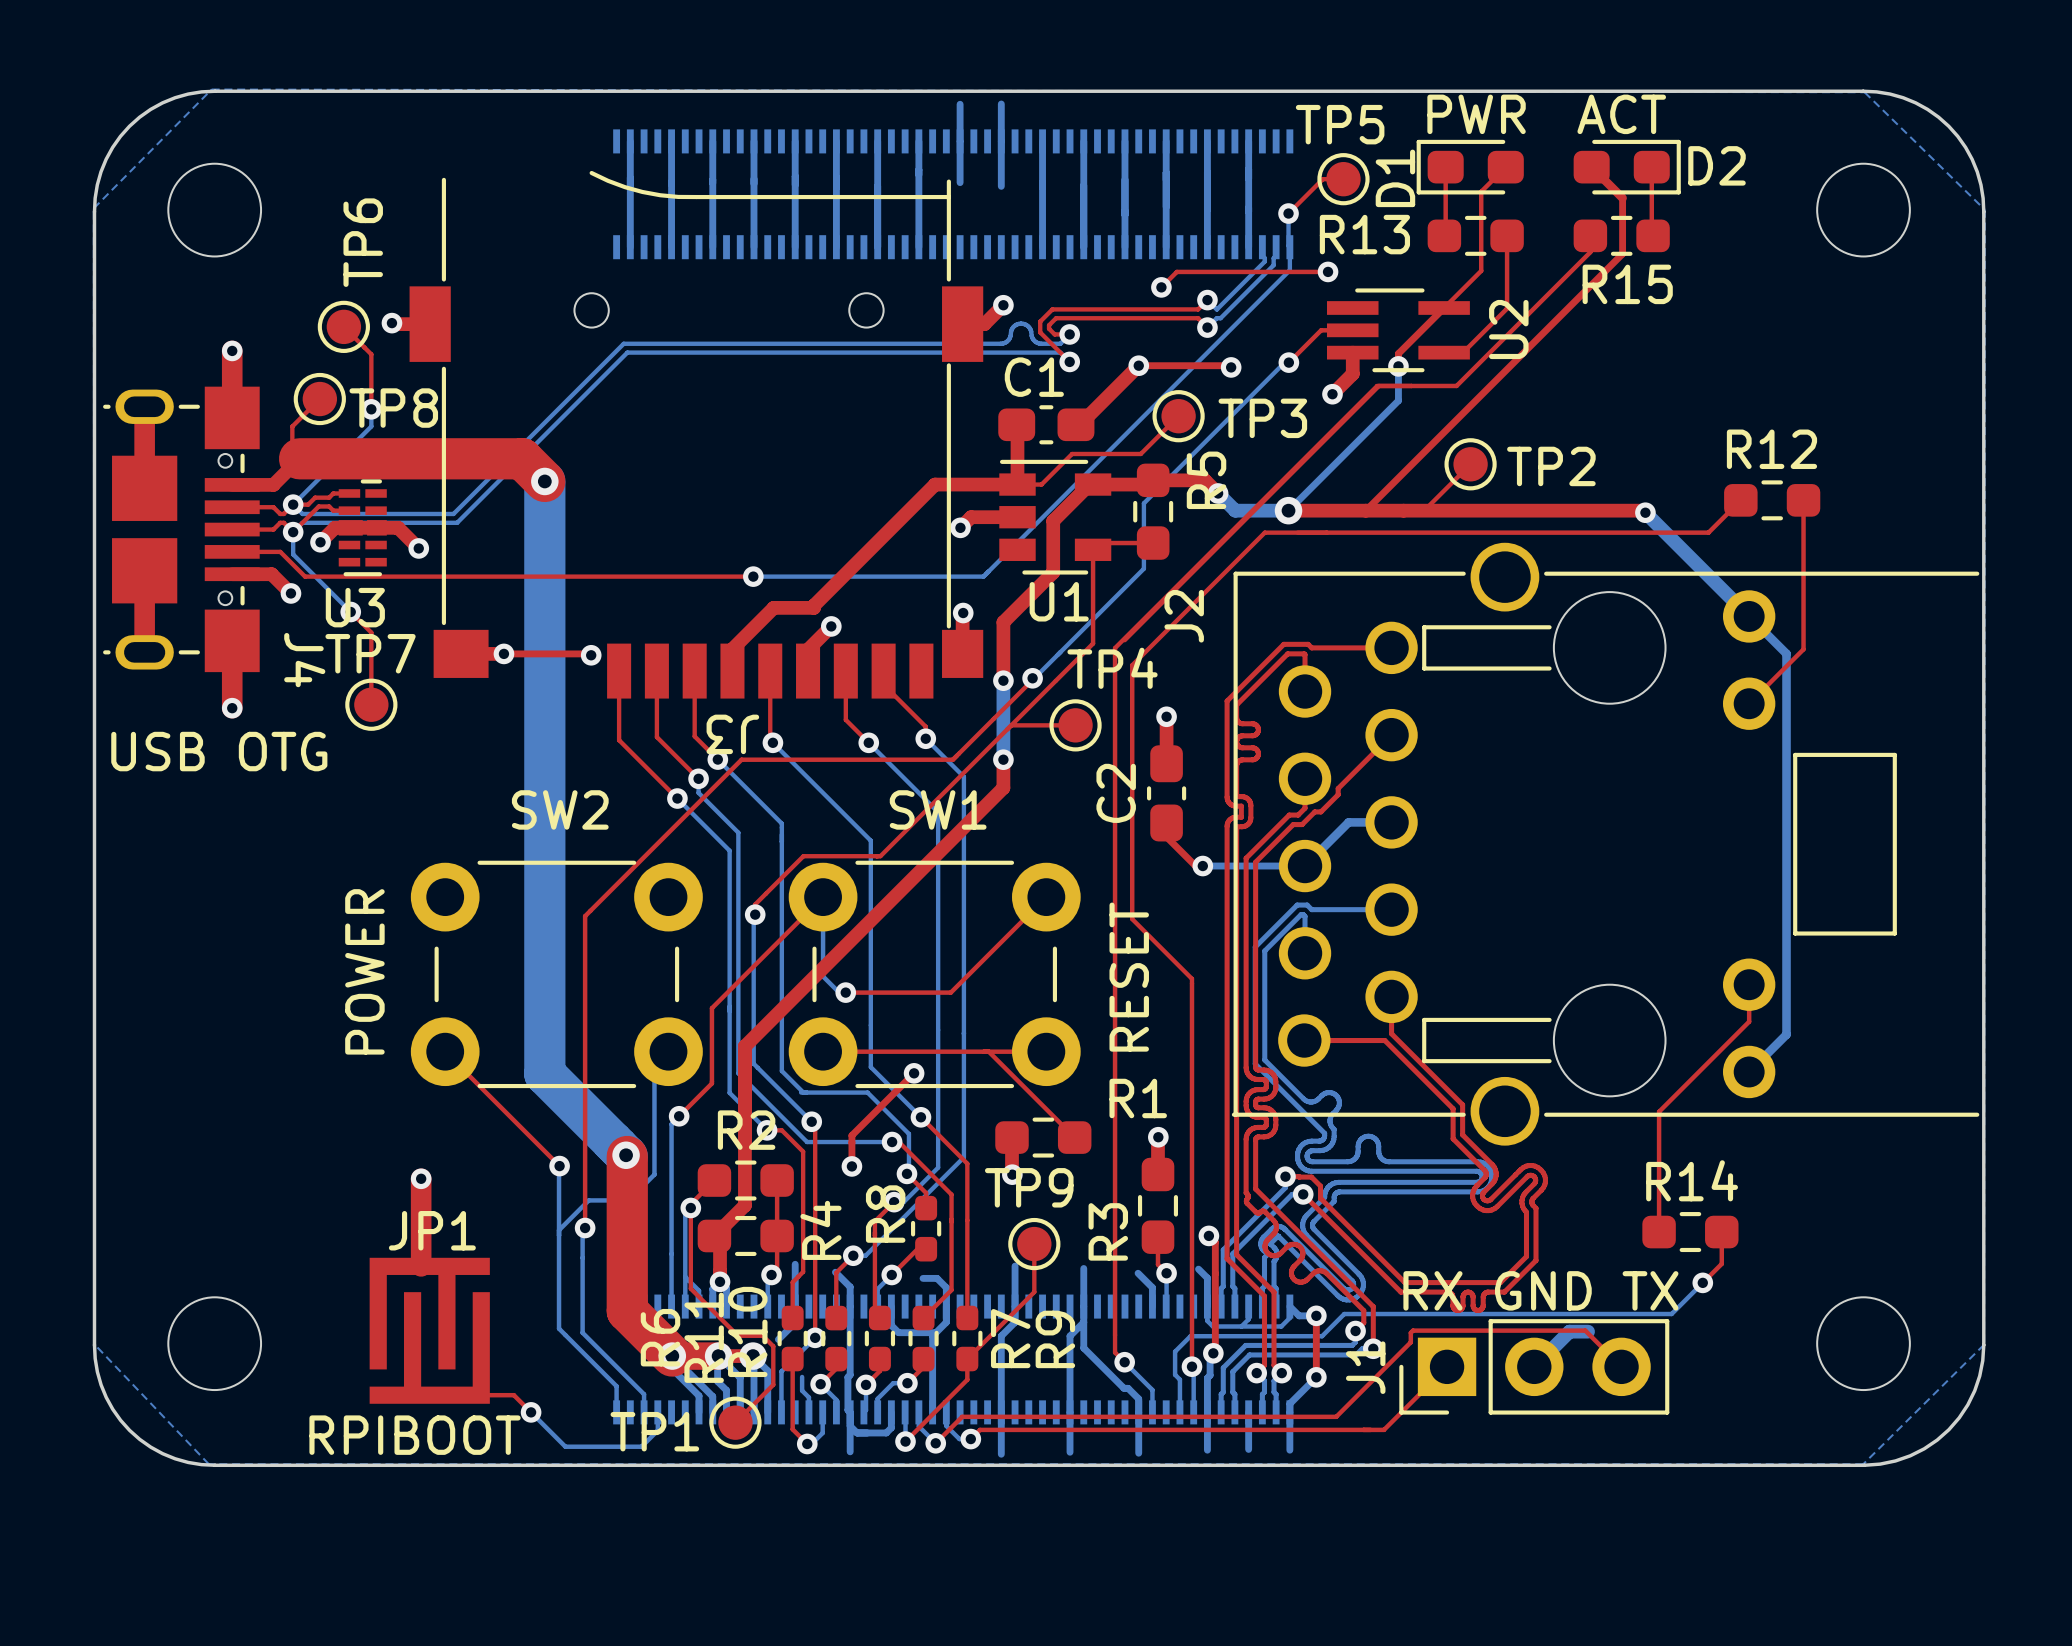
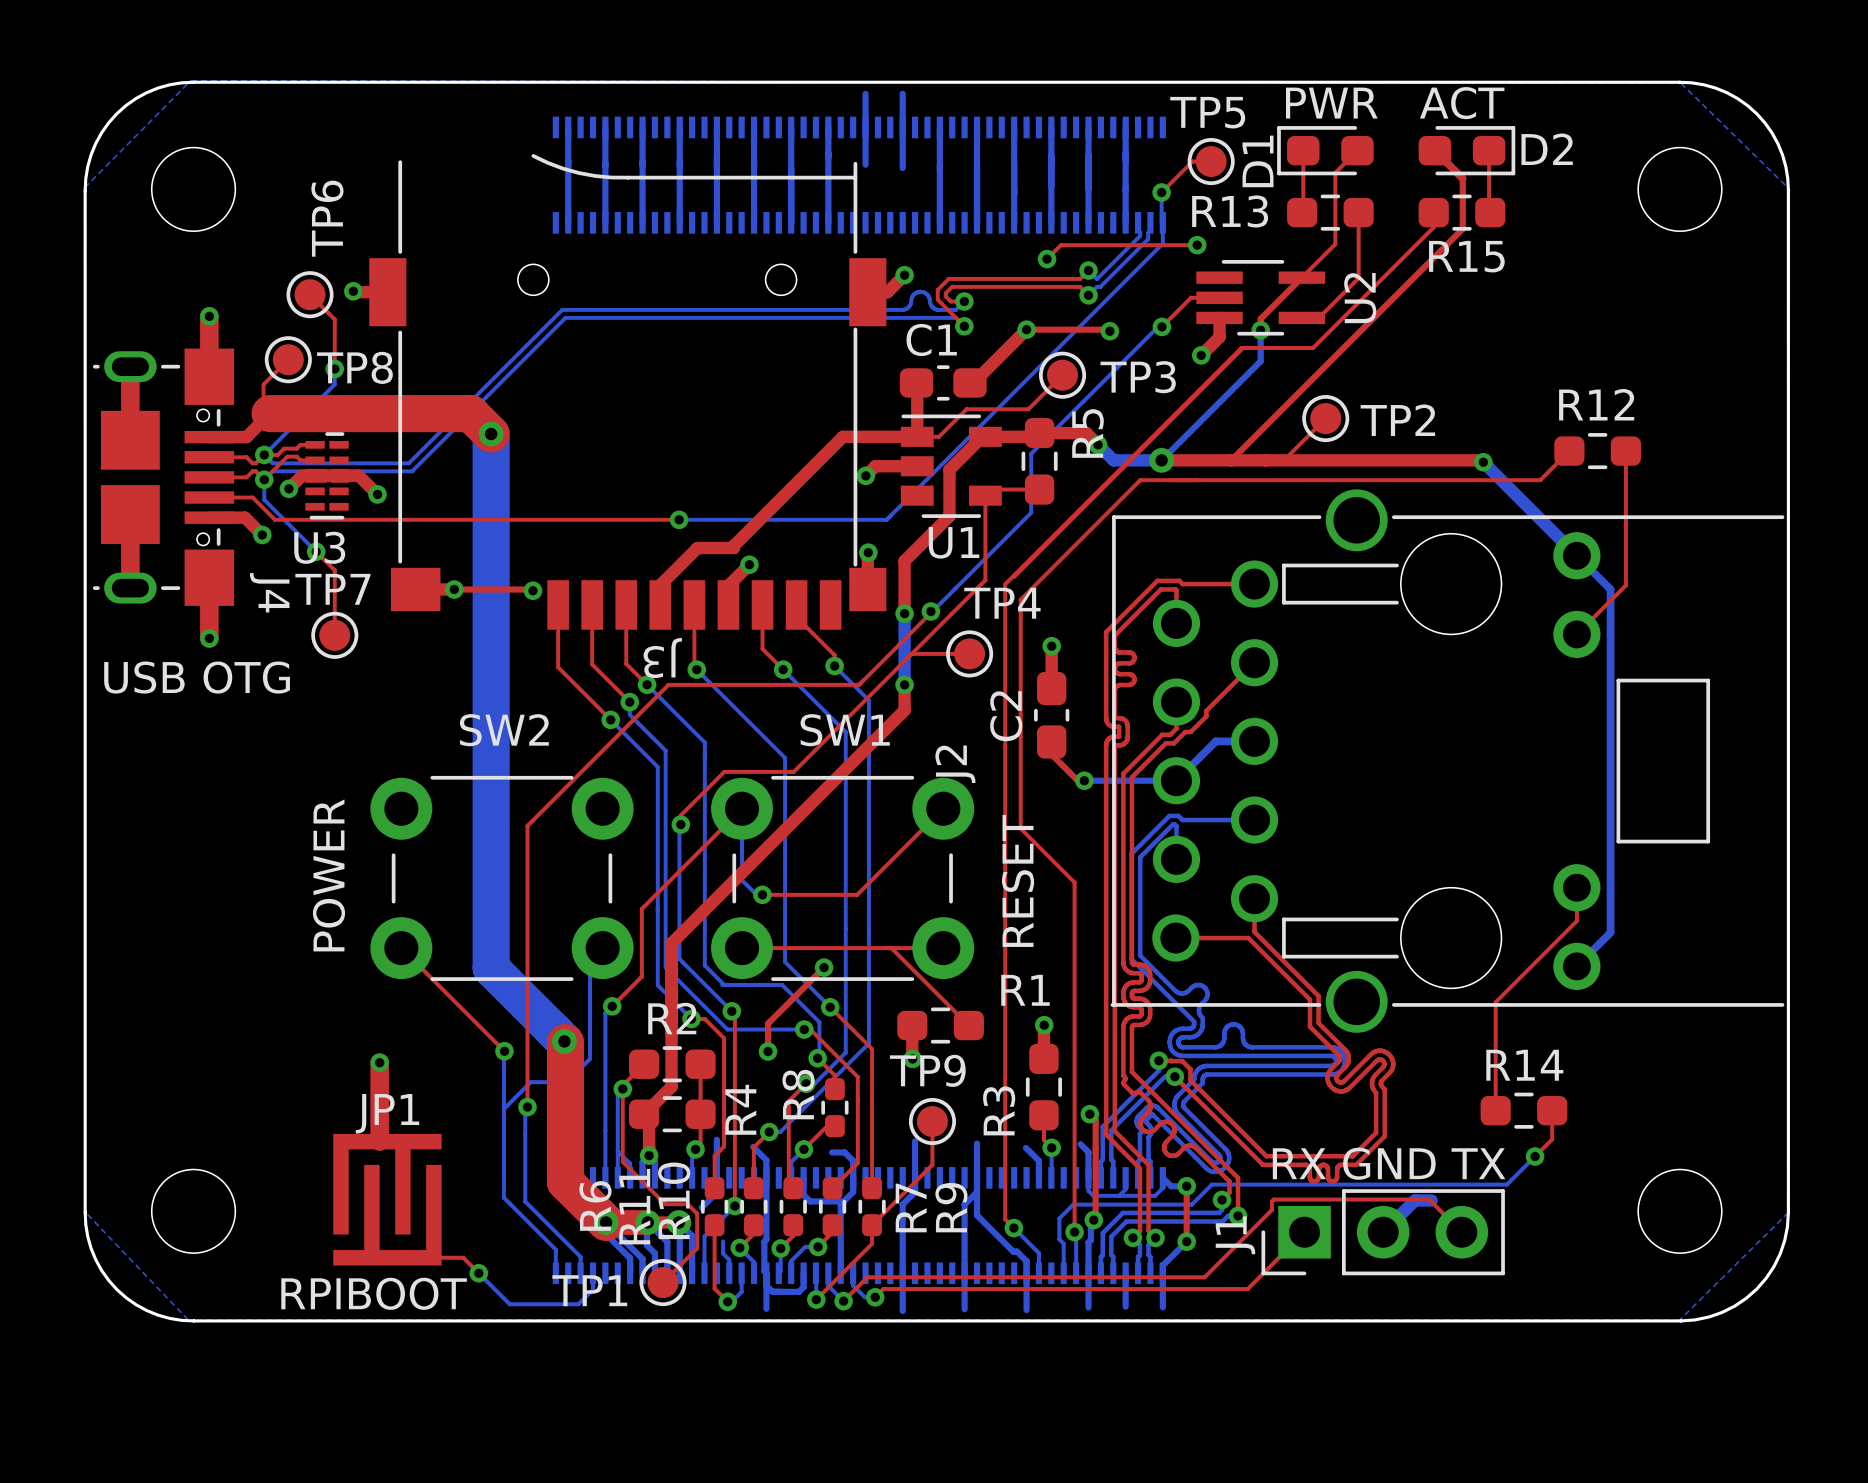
J2 name position: J2 (1184, 616) -> J2 (955, 764)

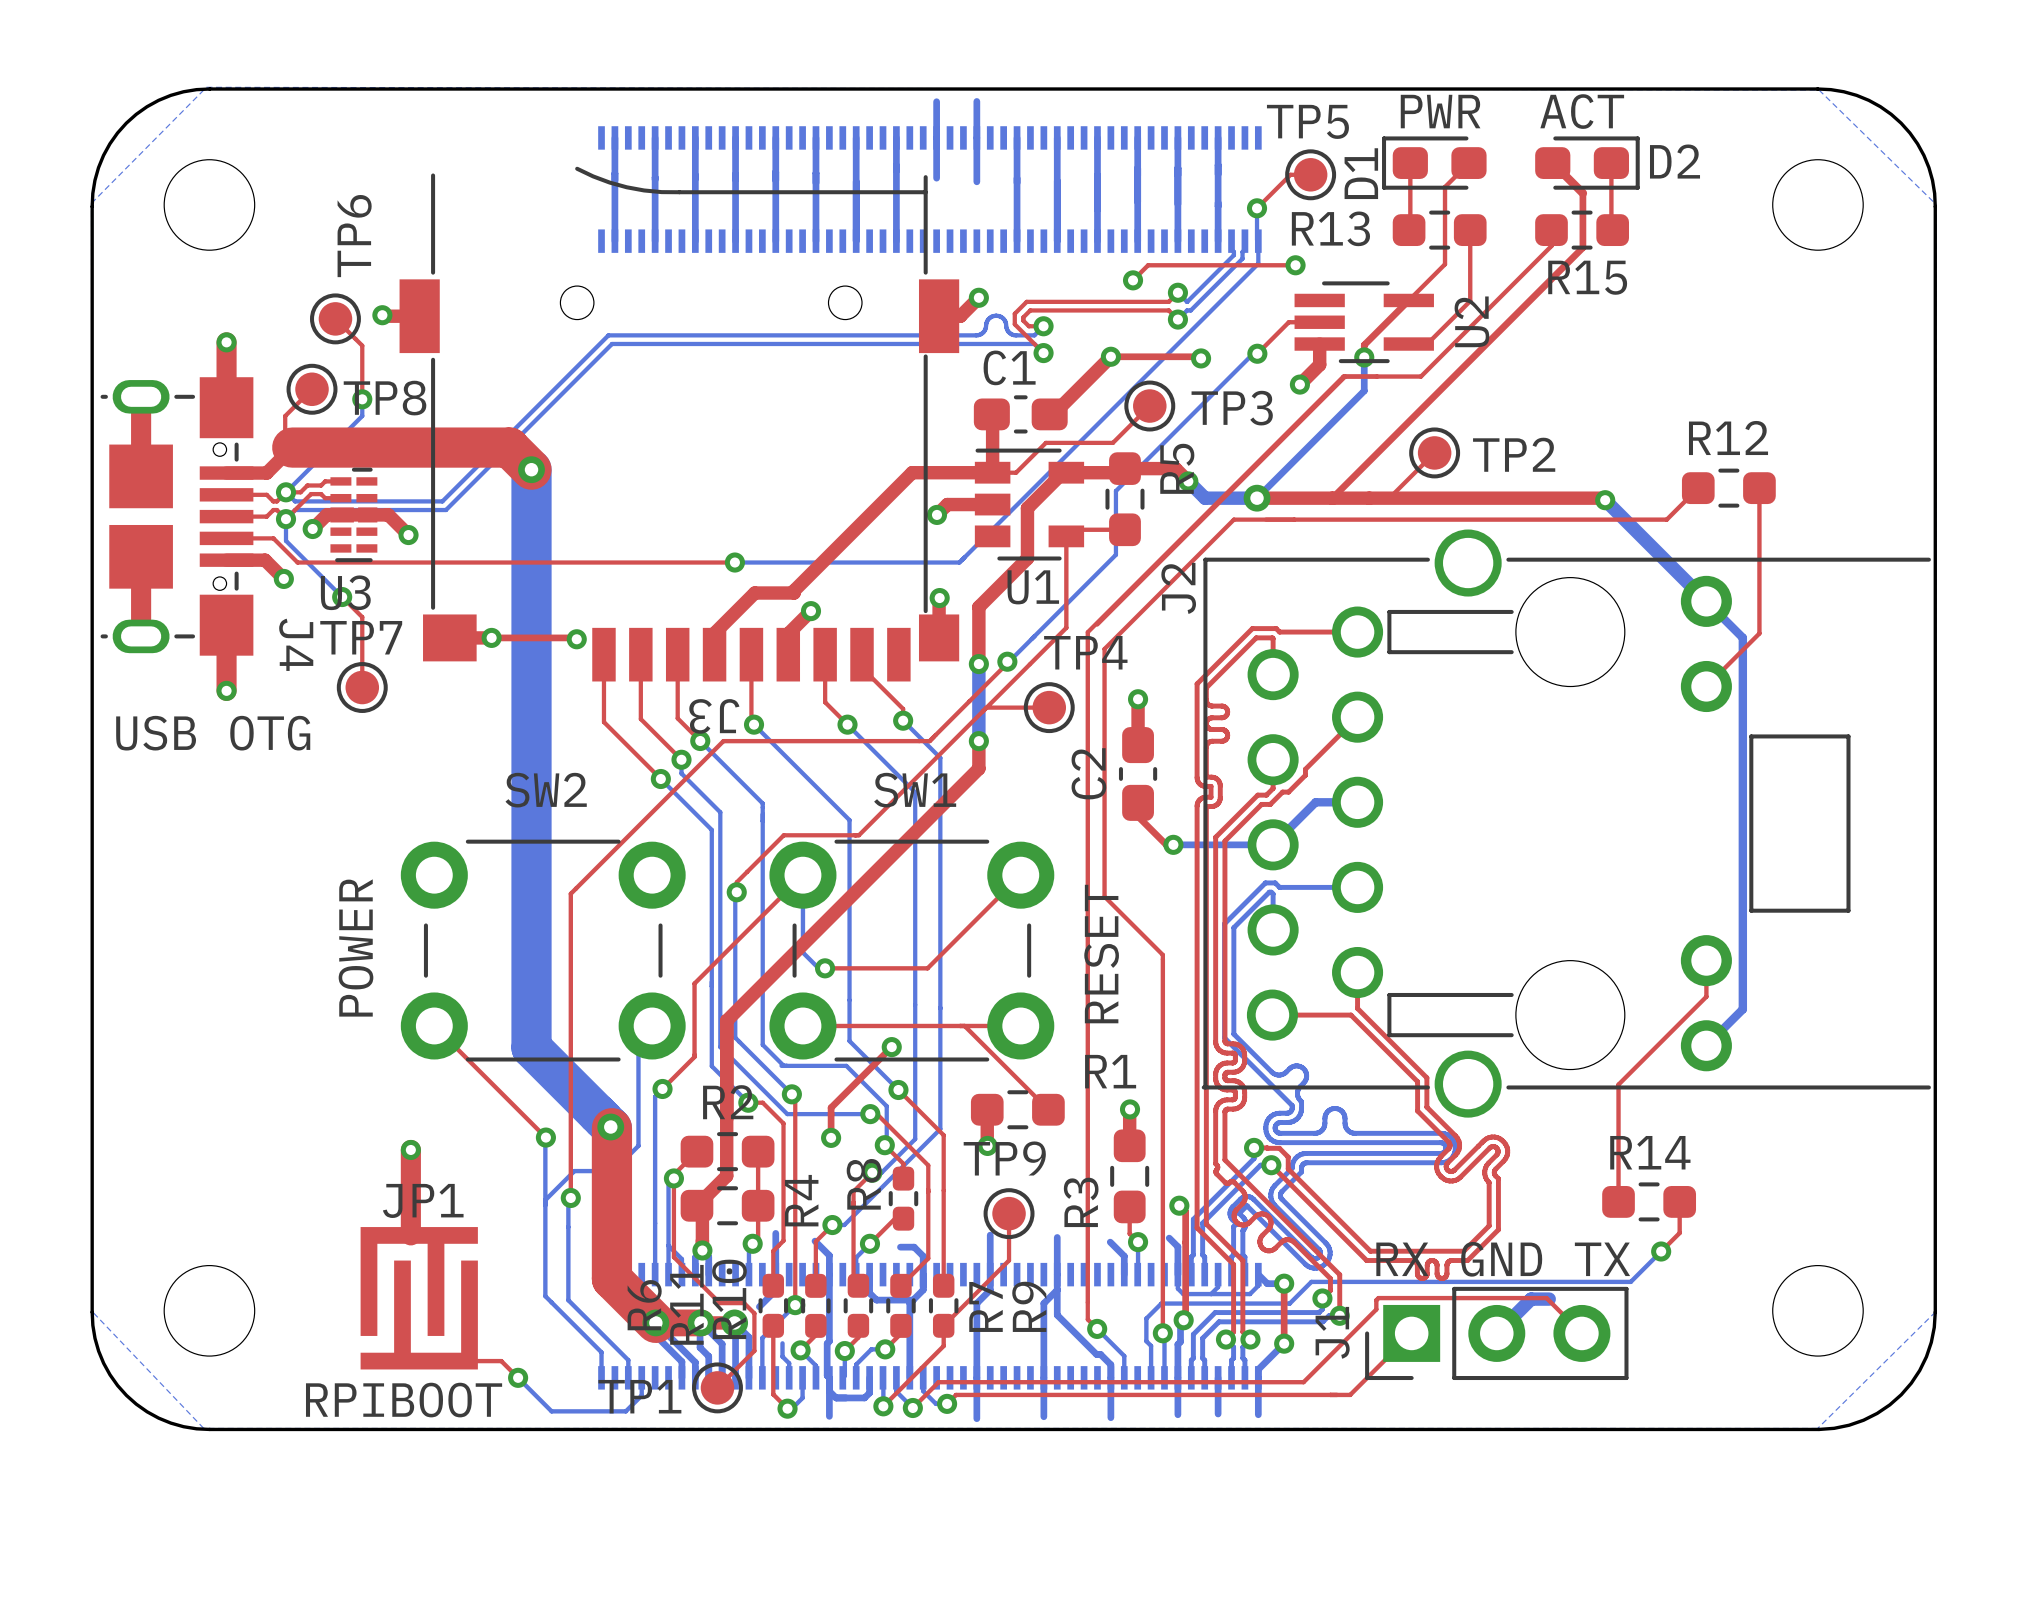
J2 name position: J2 (955, 764) -> J2 (1178, 588)

